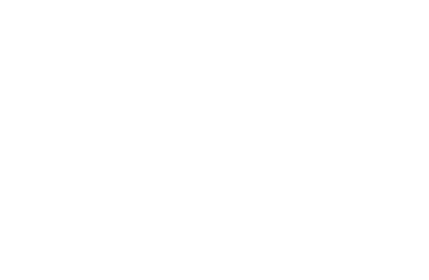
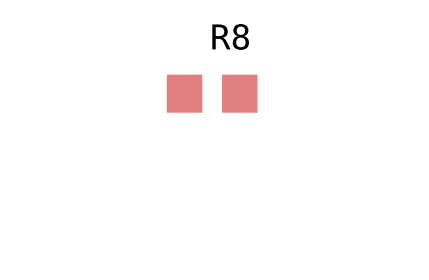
R8: none -> (212, 93)

